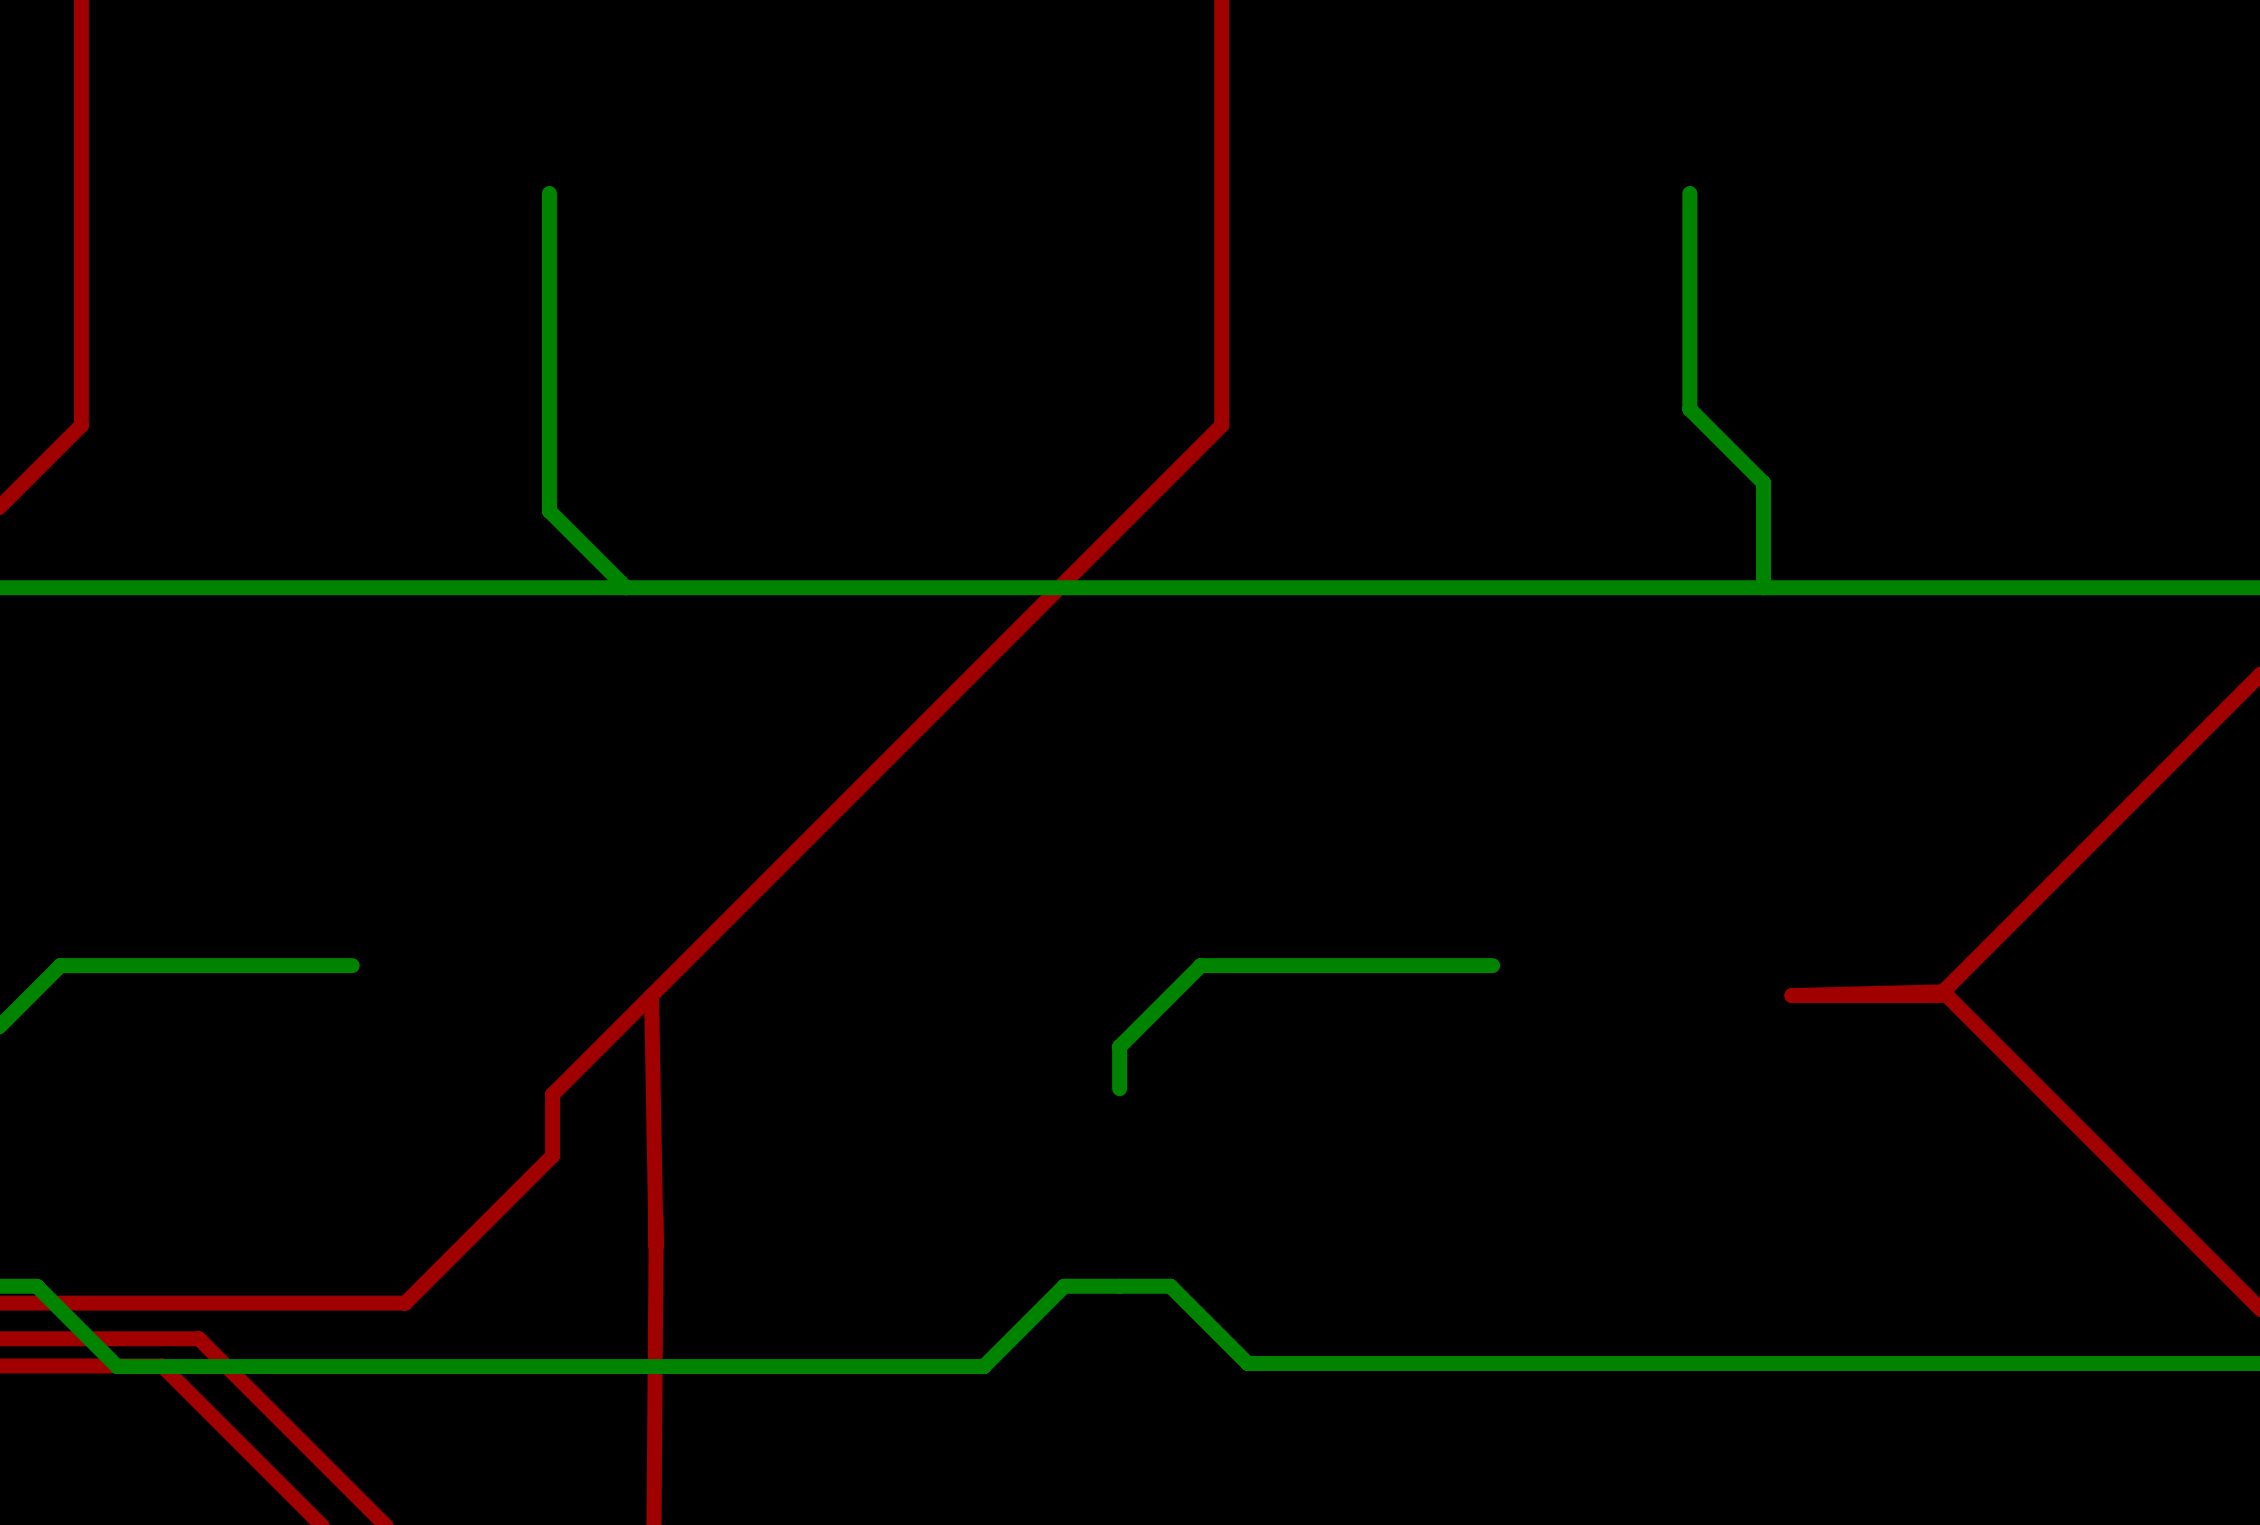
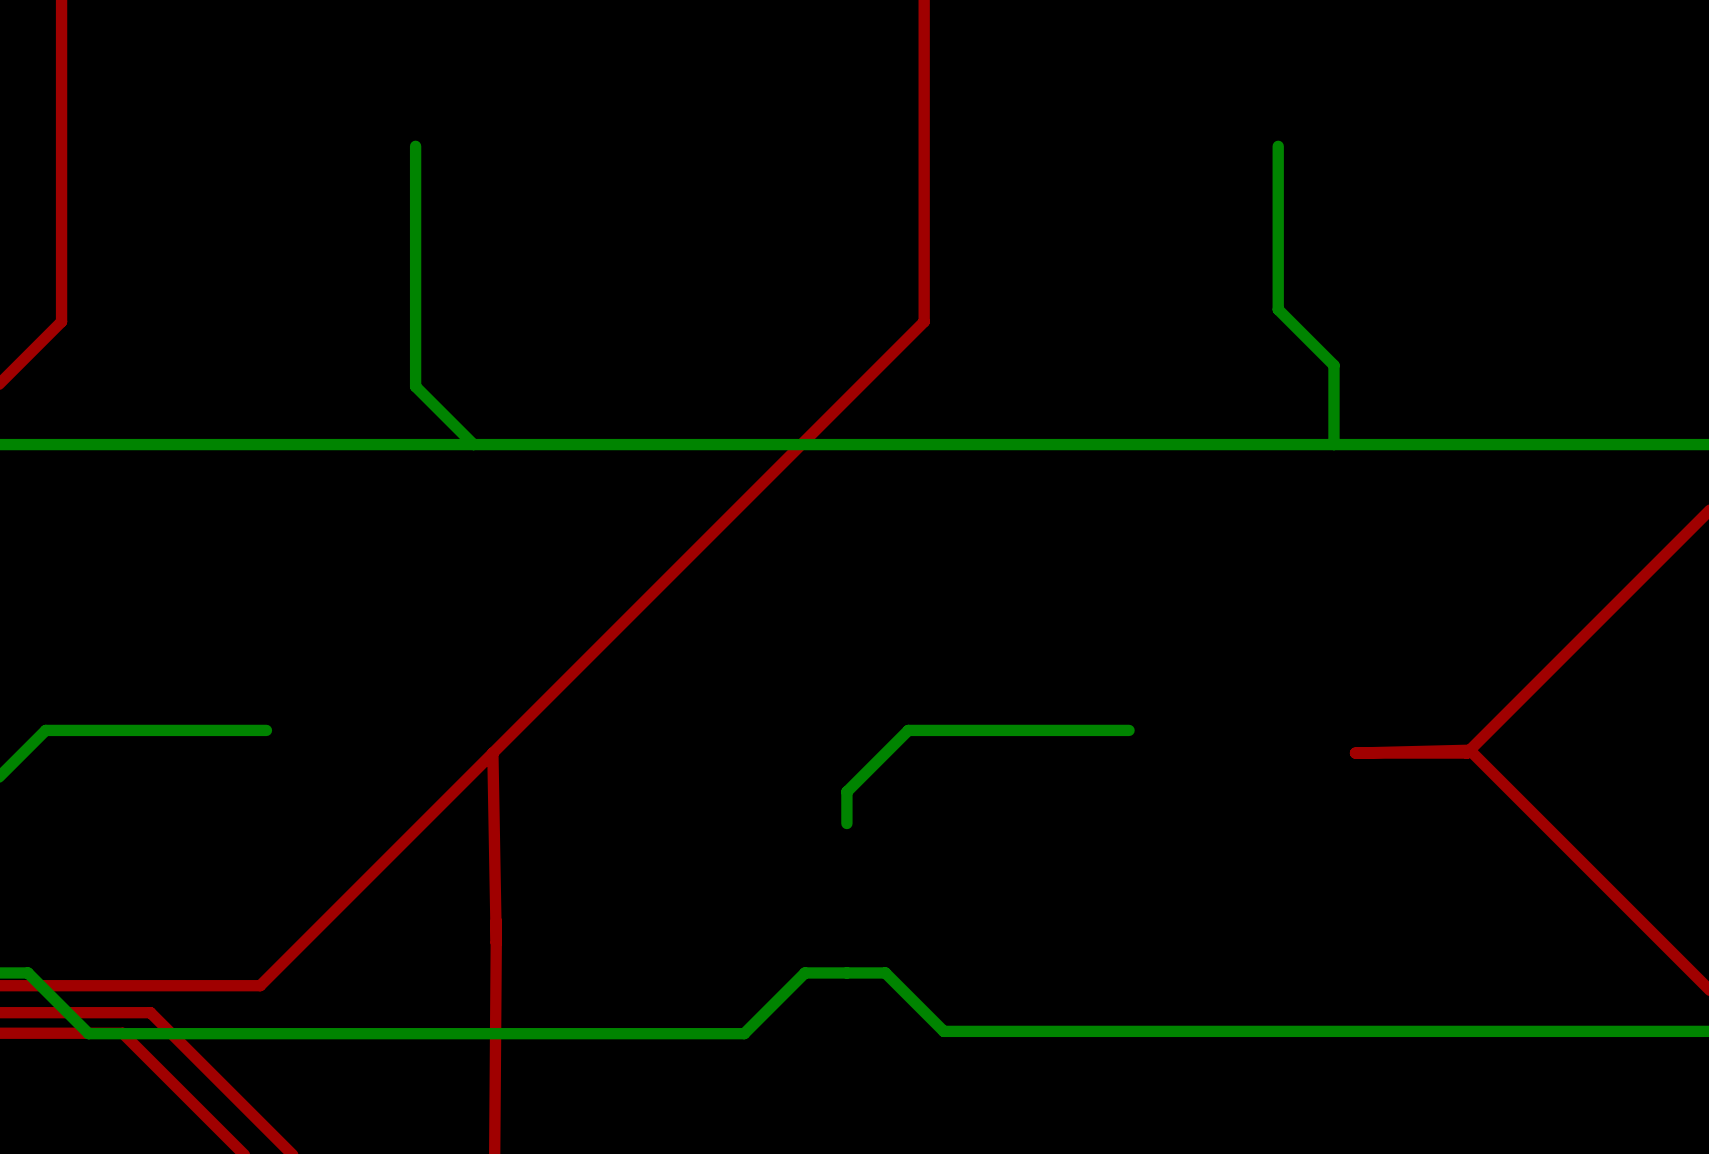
top track: (552, 1094) (552, 1155) (405, 1303) (344, 1303) -> (417, 827) (260, 985)

